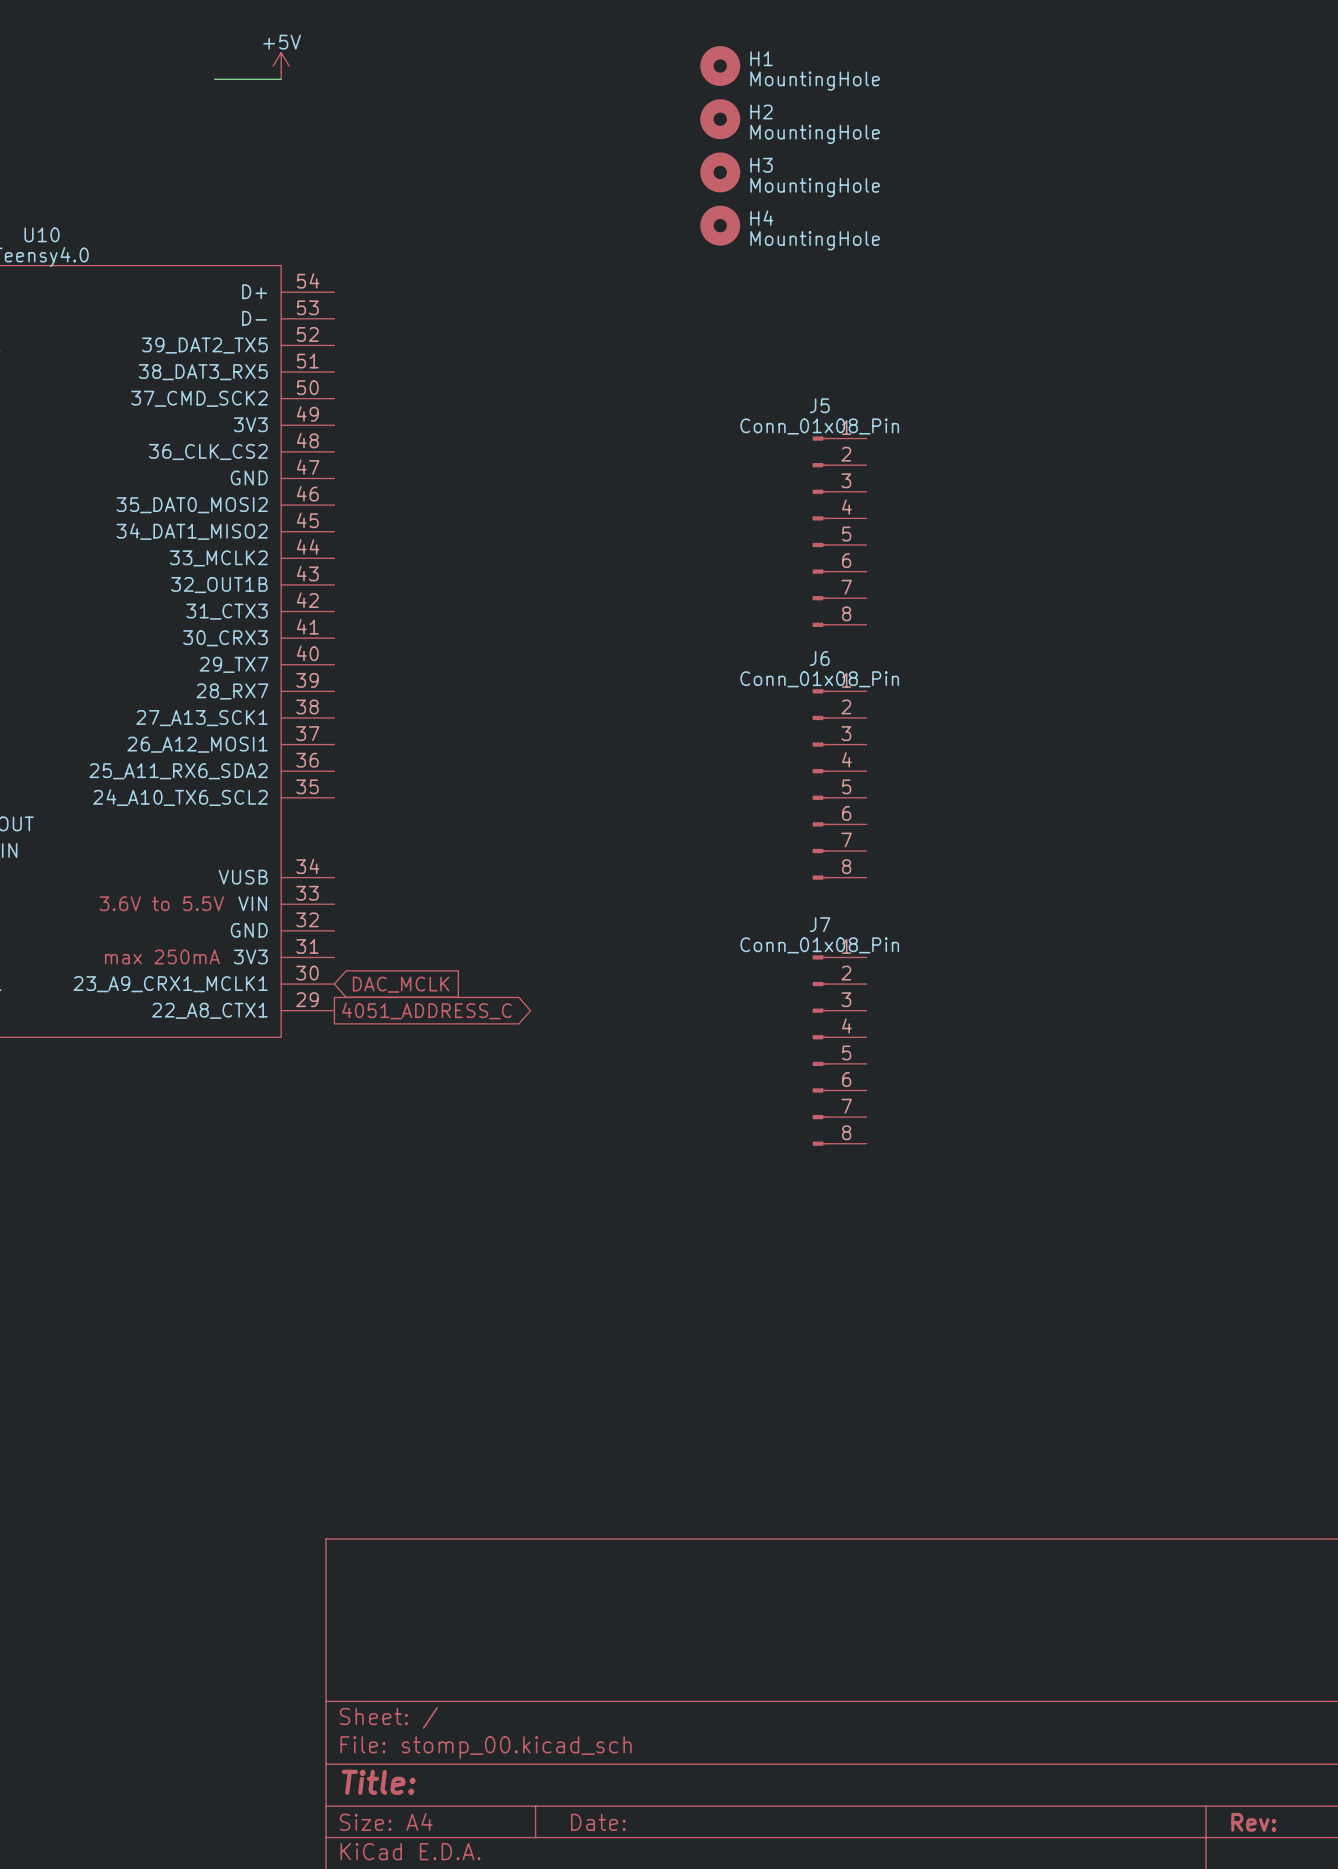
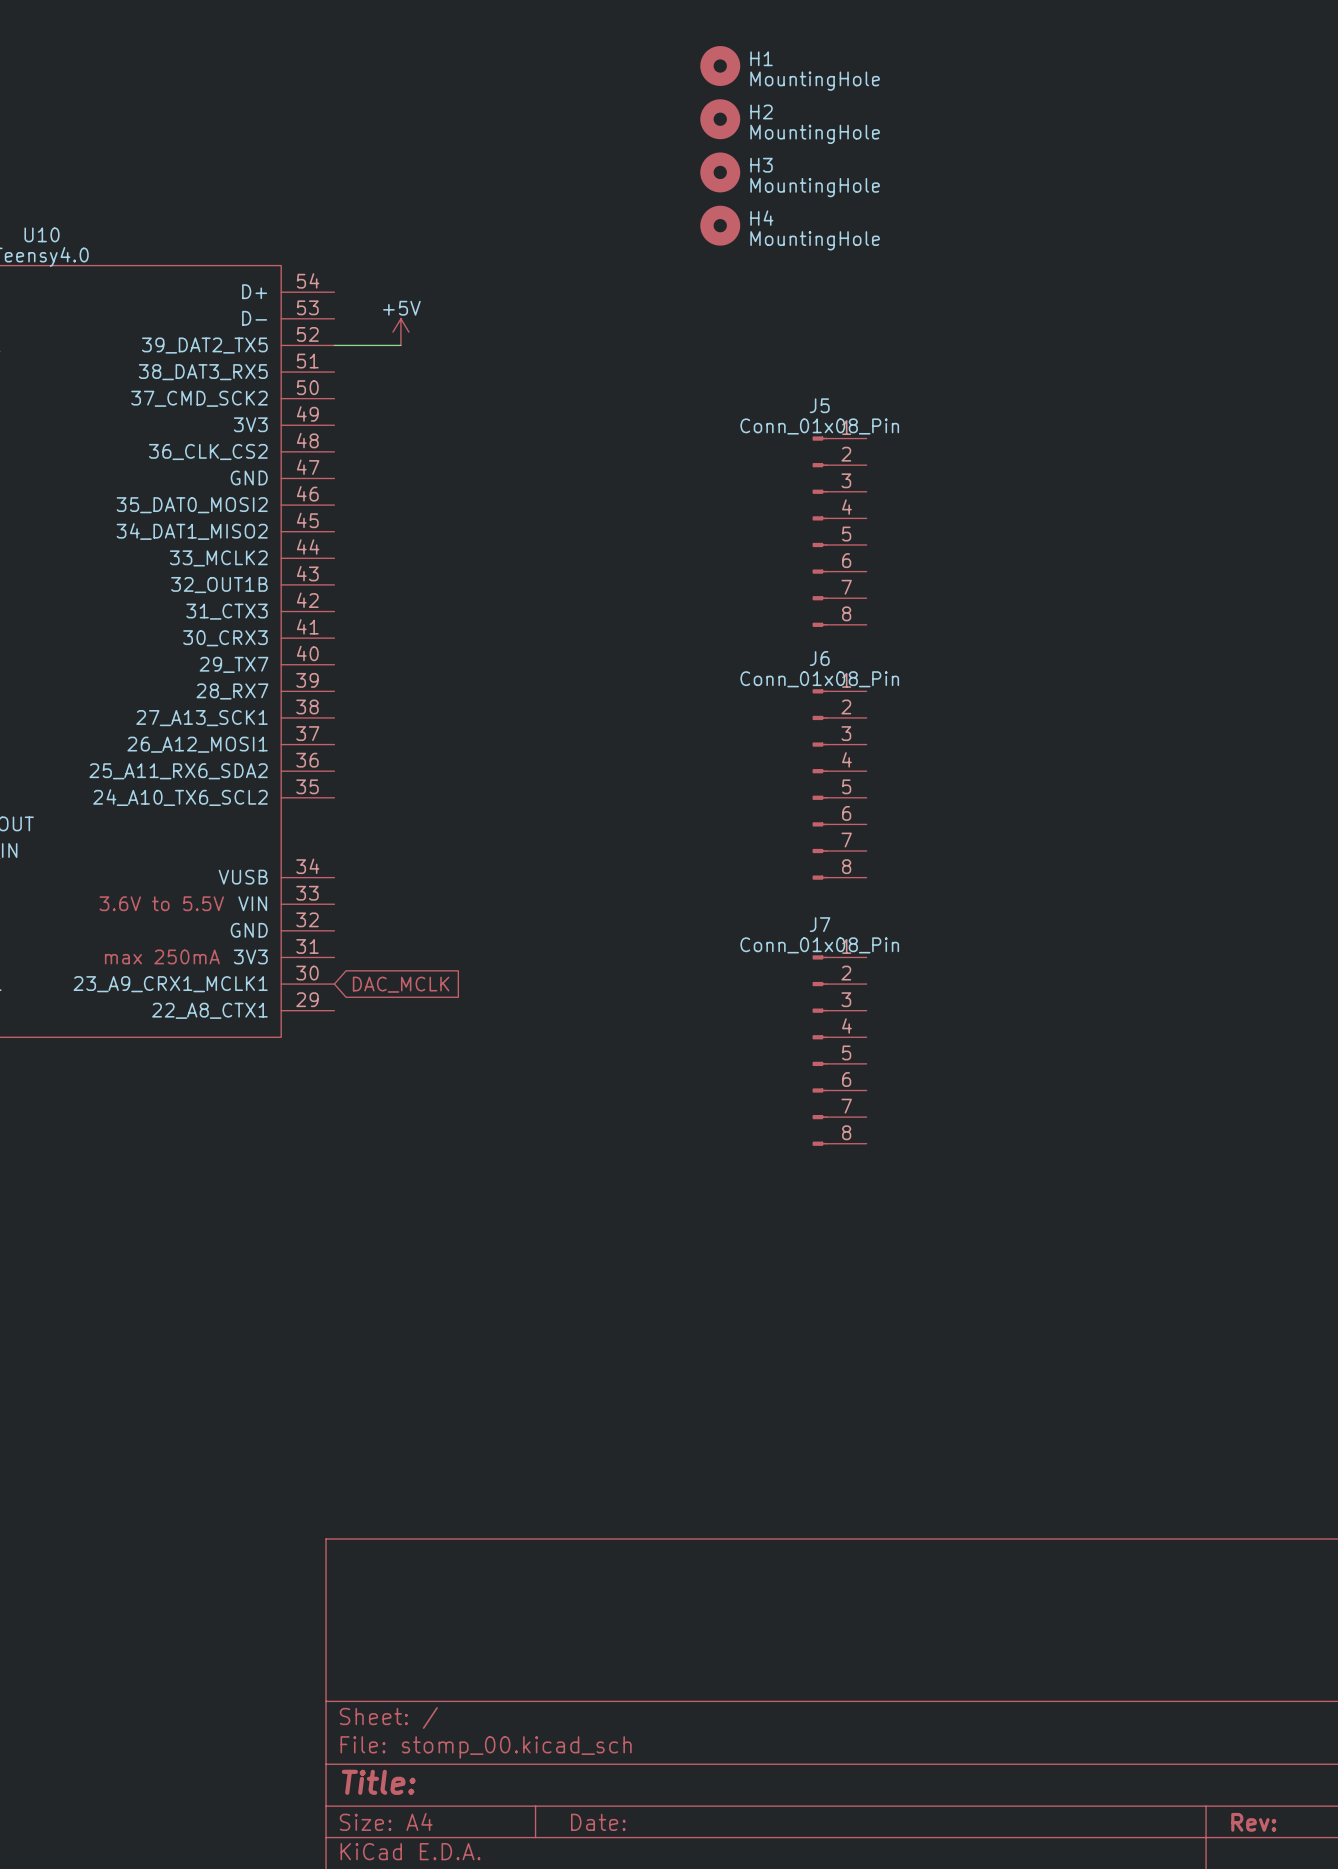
power symbol: +5V (281, 66) -> none
wire: (214, 79) (281, 79) -> none
power symbol: none -> +5V (400, 332)
wire: none -> (334, 345) (400, 345)
global label: 4051_ADDRESS_C (426, 1010) -> none

